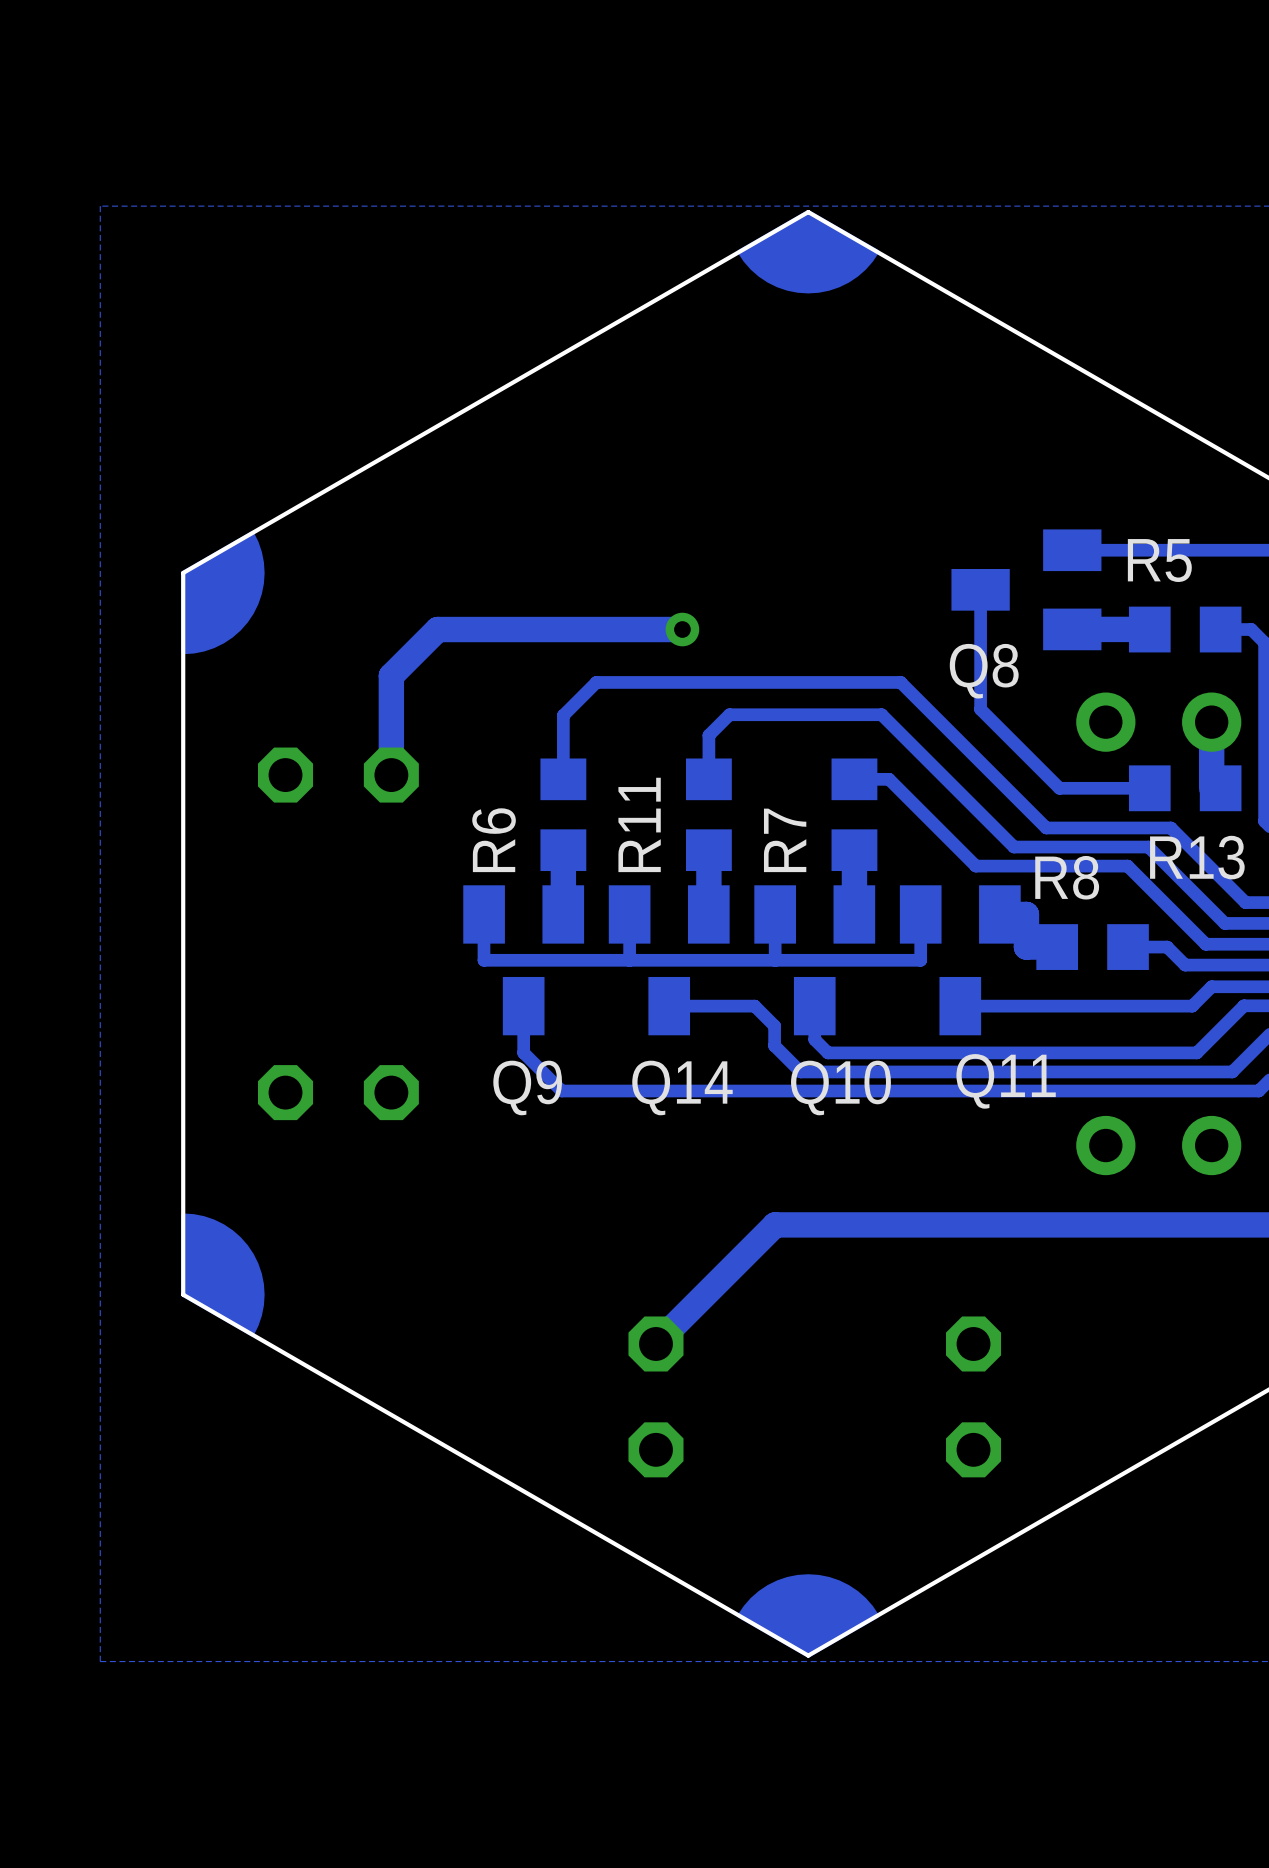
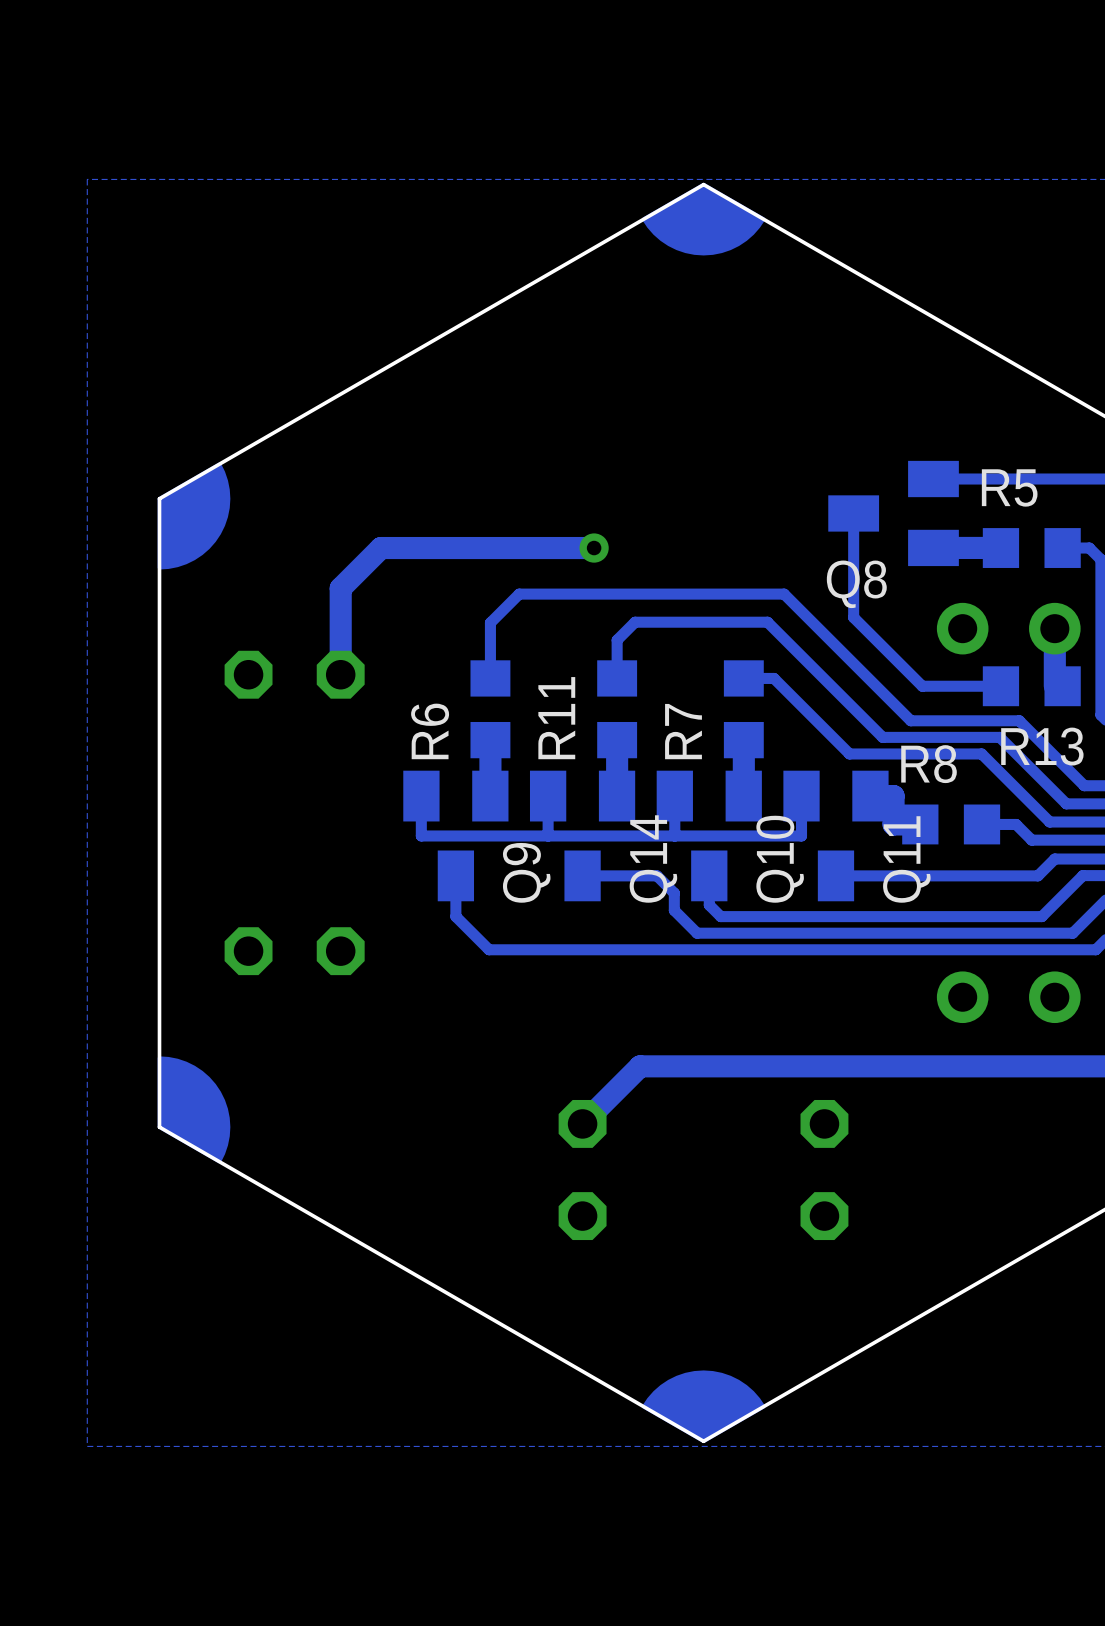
Q11 name rotation: 0° (1006, 1081) -> 90° counterclockwise (906, 859)
Q9 name rotation: 0° (527, 1087) -> 90° counterclockwise (526, 872)
Q9 name position: Q9 (527, 1087) -> Q9 (526, 872)
Q14 name rotation: 0° (682, 1087) -> 90° counterclockwise (653, 858)
Q10 name rotation: 0° (840, 1087) -> 90° counterclockwise (780, 859)
track: (775, 1224) (655, 1343) -> (674, 1066) (640, 1066) (582, 1123)
part position: (655, 1396) -> (582, 1170)
part position: (973, 1396) -> (824, 1170)

